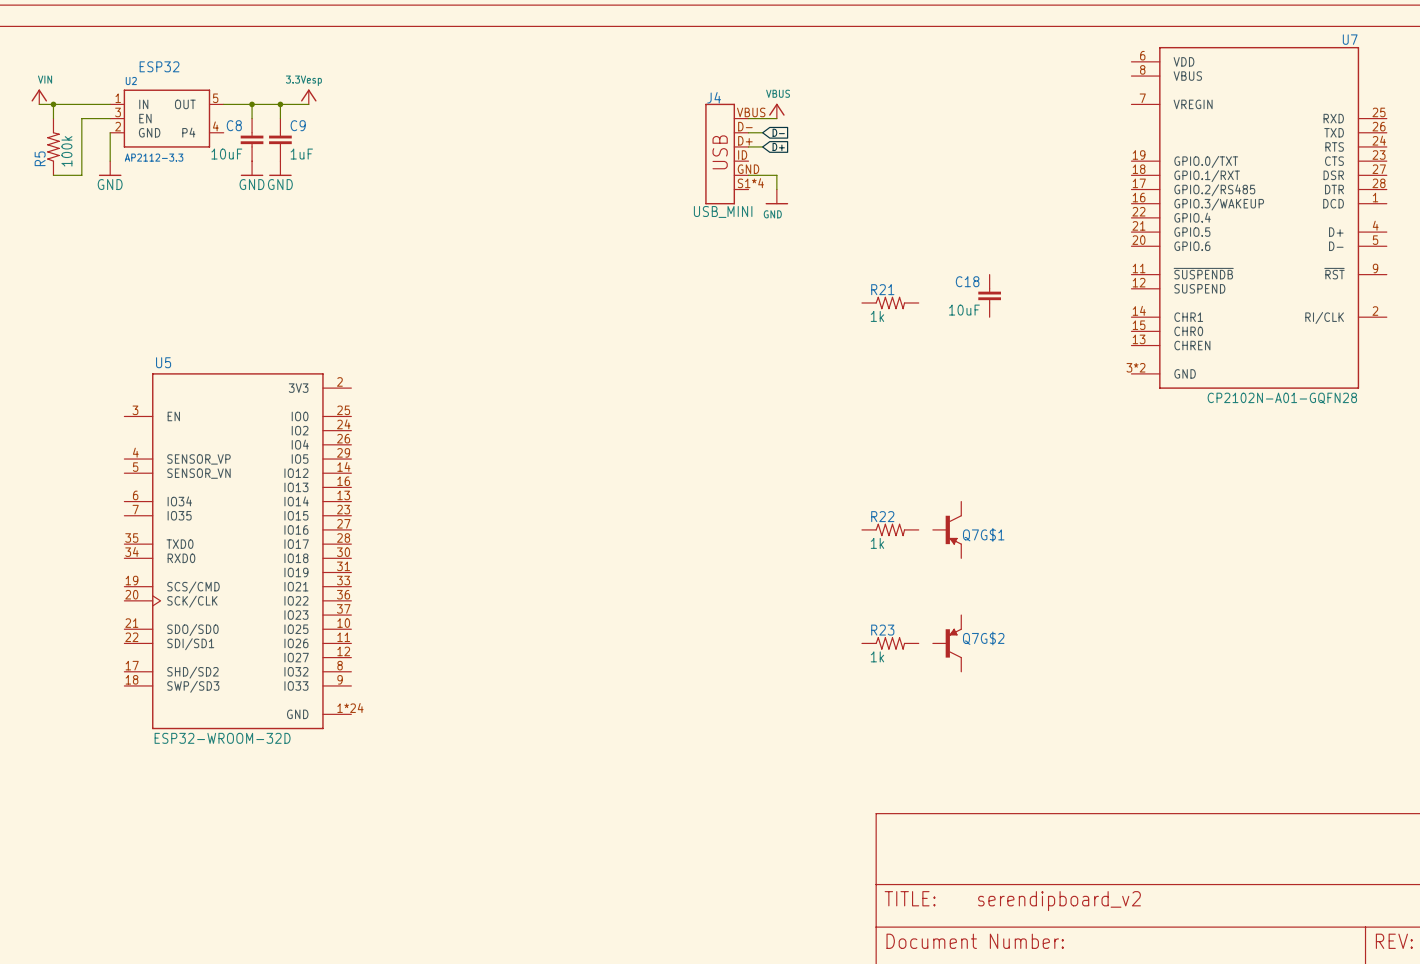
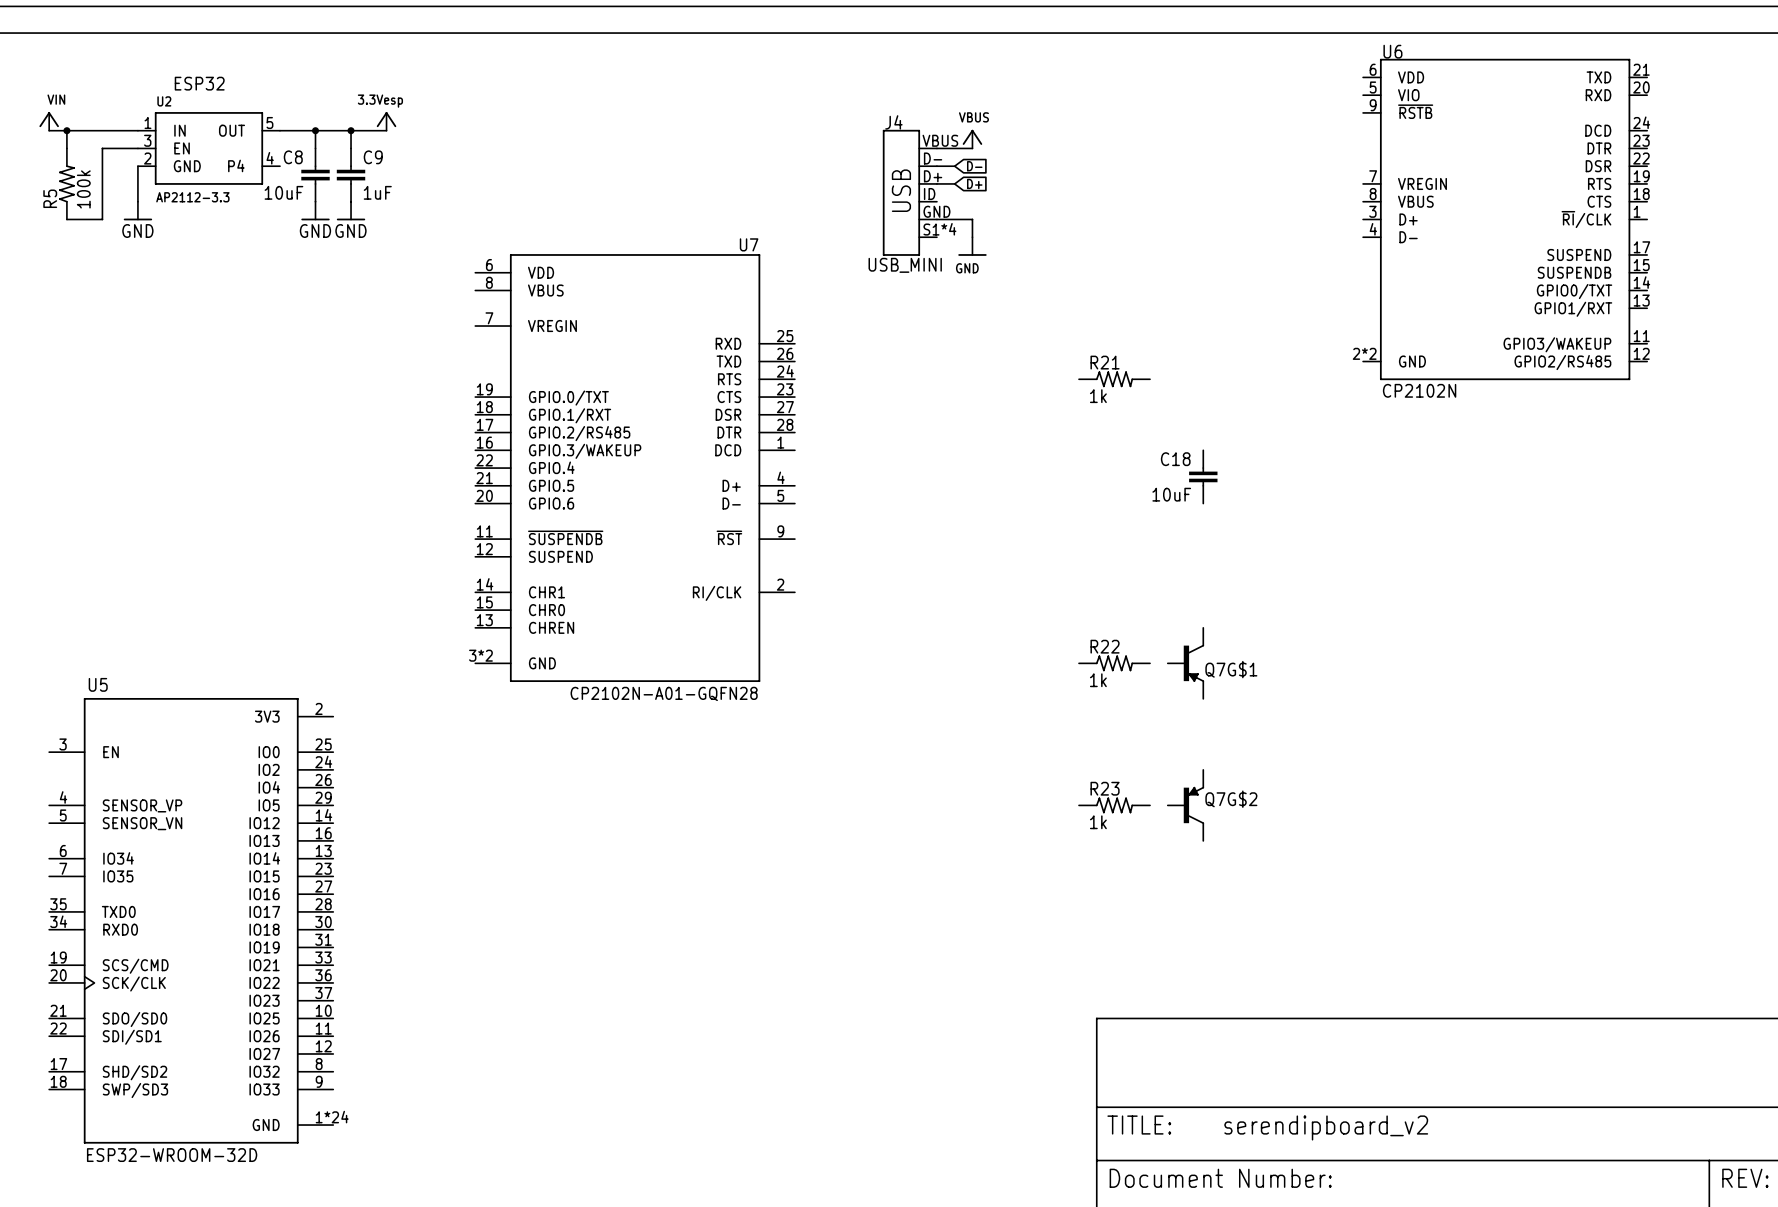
U6: none -> CP2102N (1505, 219)
U7 position: (1259, 217) -> (635, 468)
C18 position: (989, 295) -> (1203, 476)
U5 position: (237, 551) -> (191, 920)

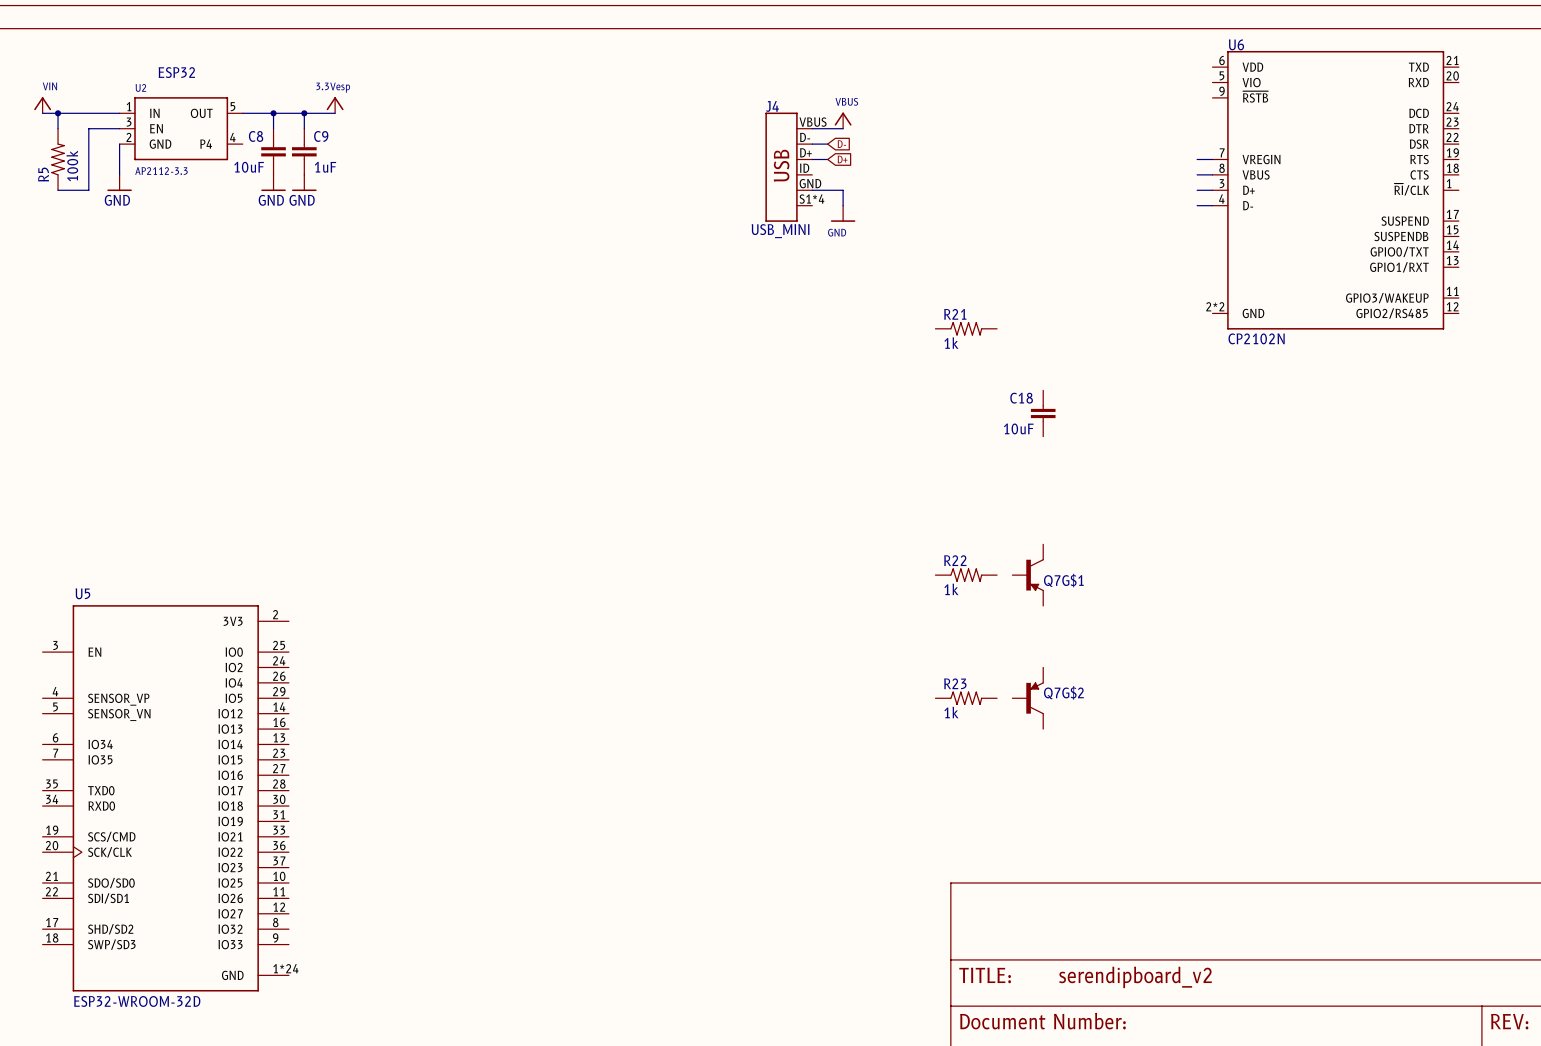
wire: none -> (1197, 159) (1212, 159)
wire: none -> (1197, 174) (1212, 174)
wire: none -> (1197, 190) (1212, 190)
U6 position: (1505, 219) -> (1335, 190)
wire: none -> (1197, 205) (1212, 205)
U7: CP2102N-A01-GQFN28 (635, 468) -> none

